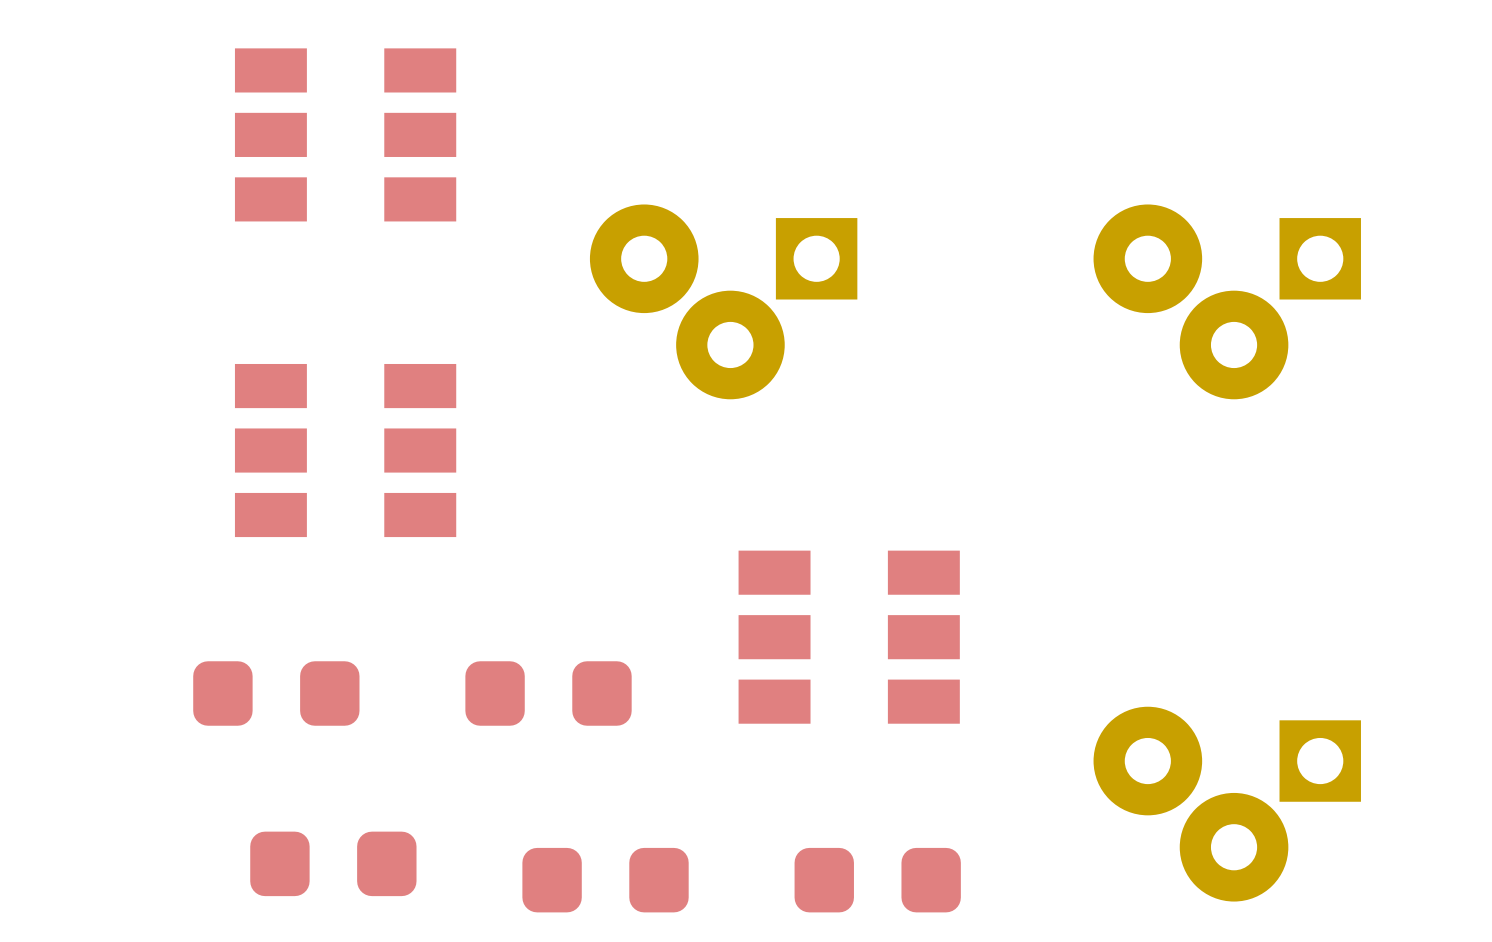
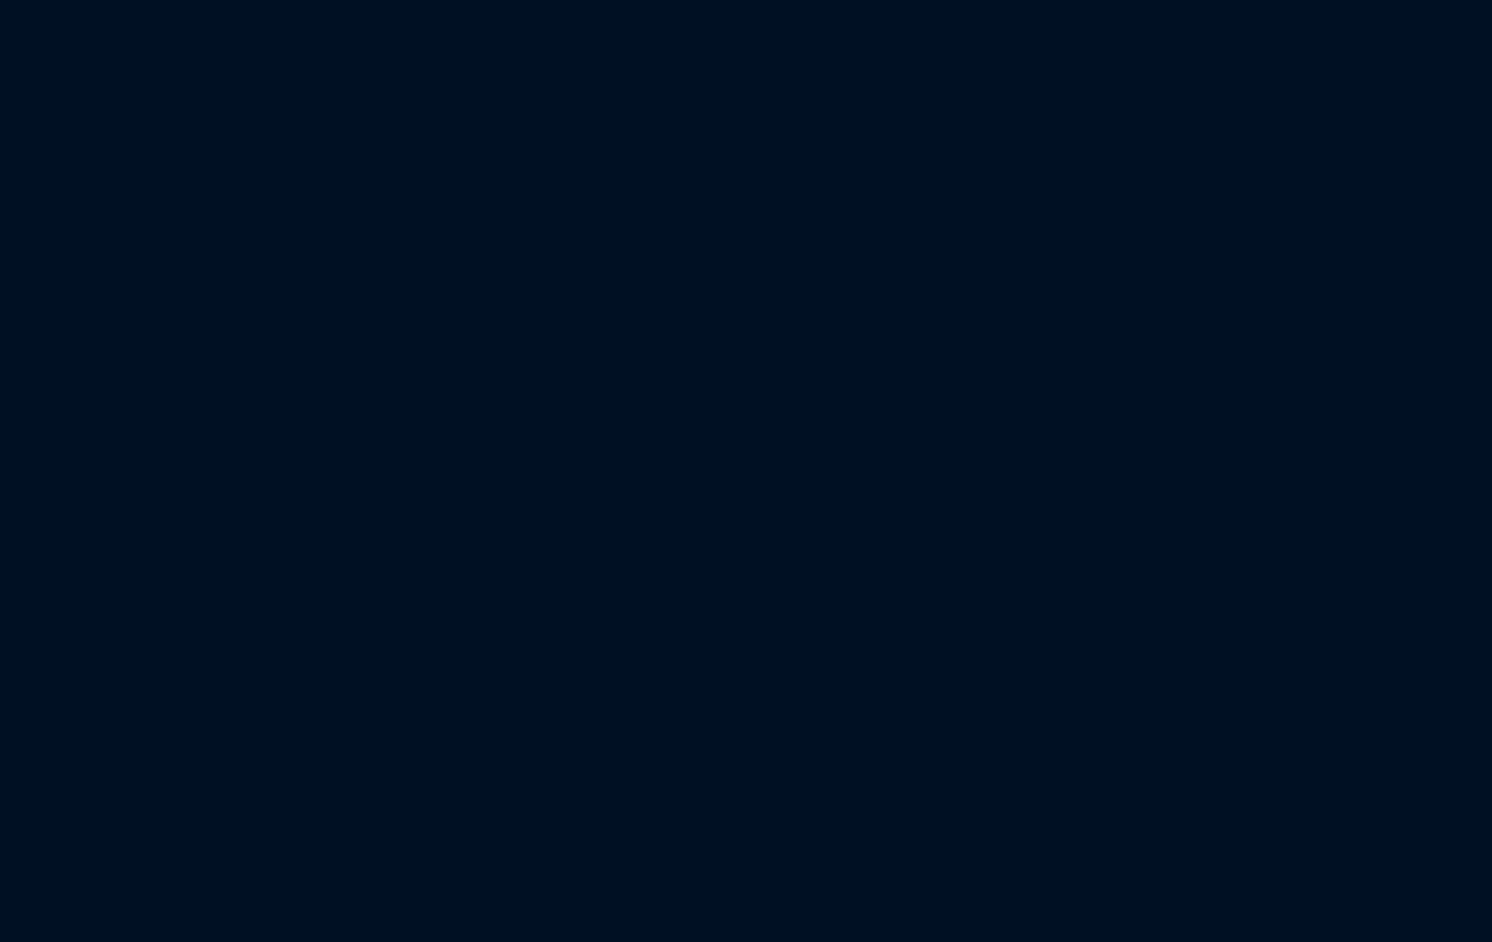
part: (345, 134) -> none
part: (723, 301) -> none
part: (1227, 301) -> none
part: (345, 450) -> none
part: (849, 637) -> none
part: (276, 693) -> none
part: (548, 693) -> none
part: (1227, 804) -> none
part: (333, 863) -> none
part: (605, 880) -> none
part: (877, 880) -> none

